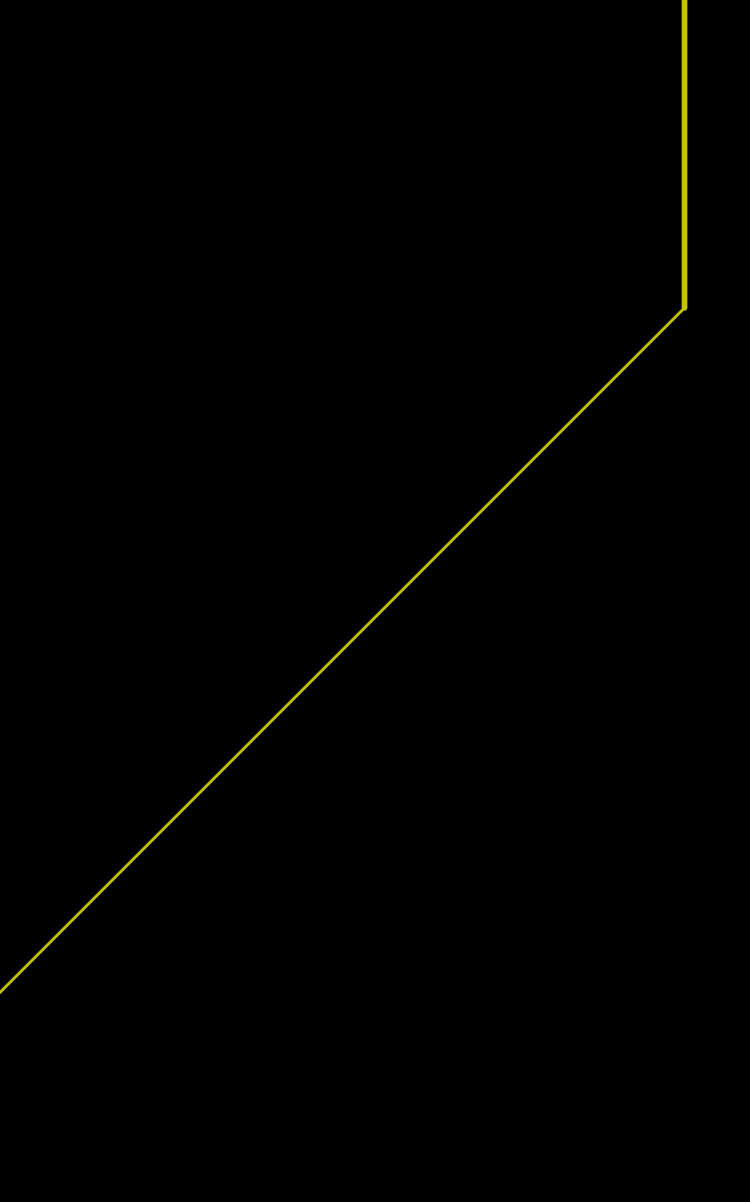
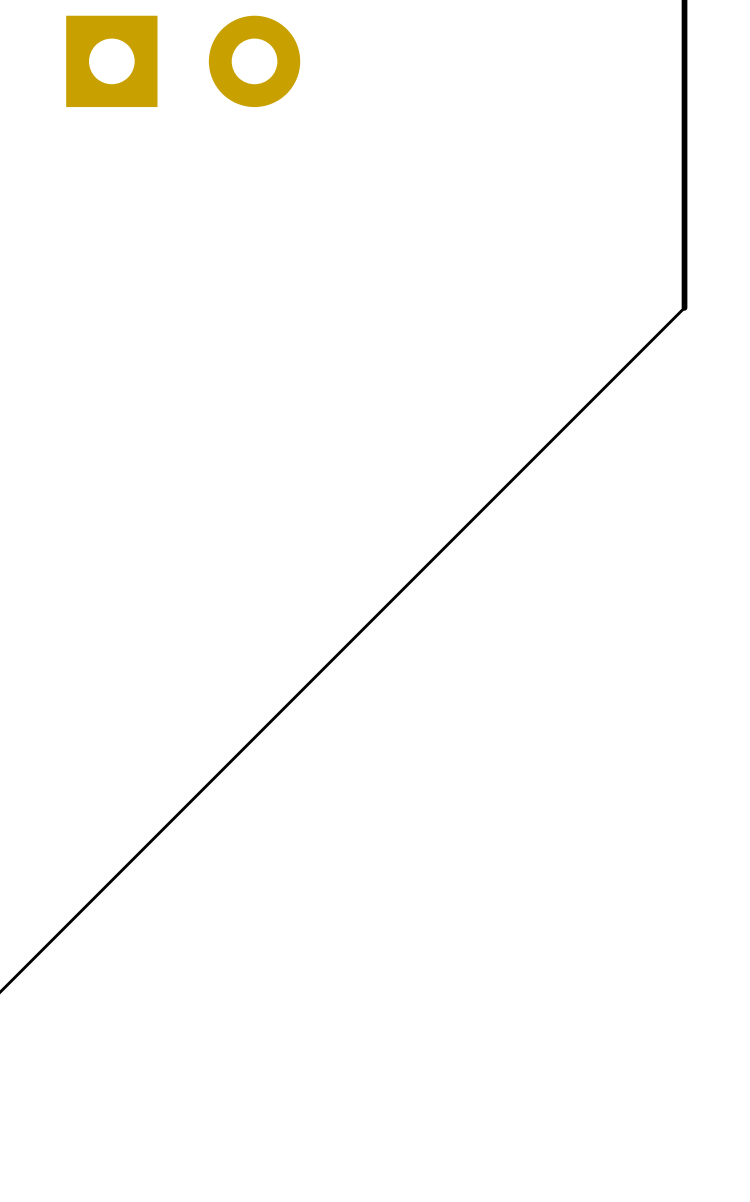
part: none -> (183, 61)

